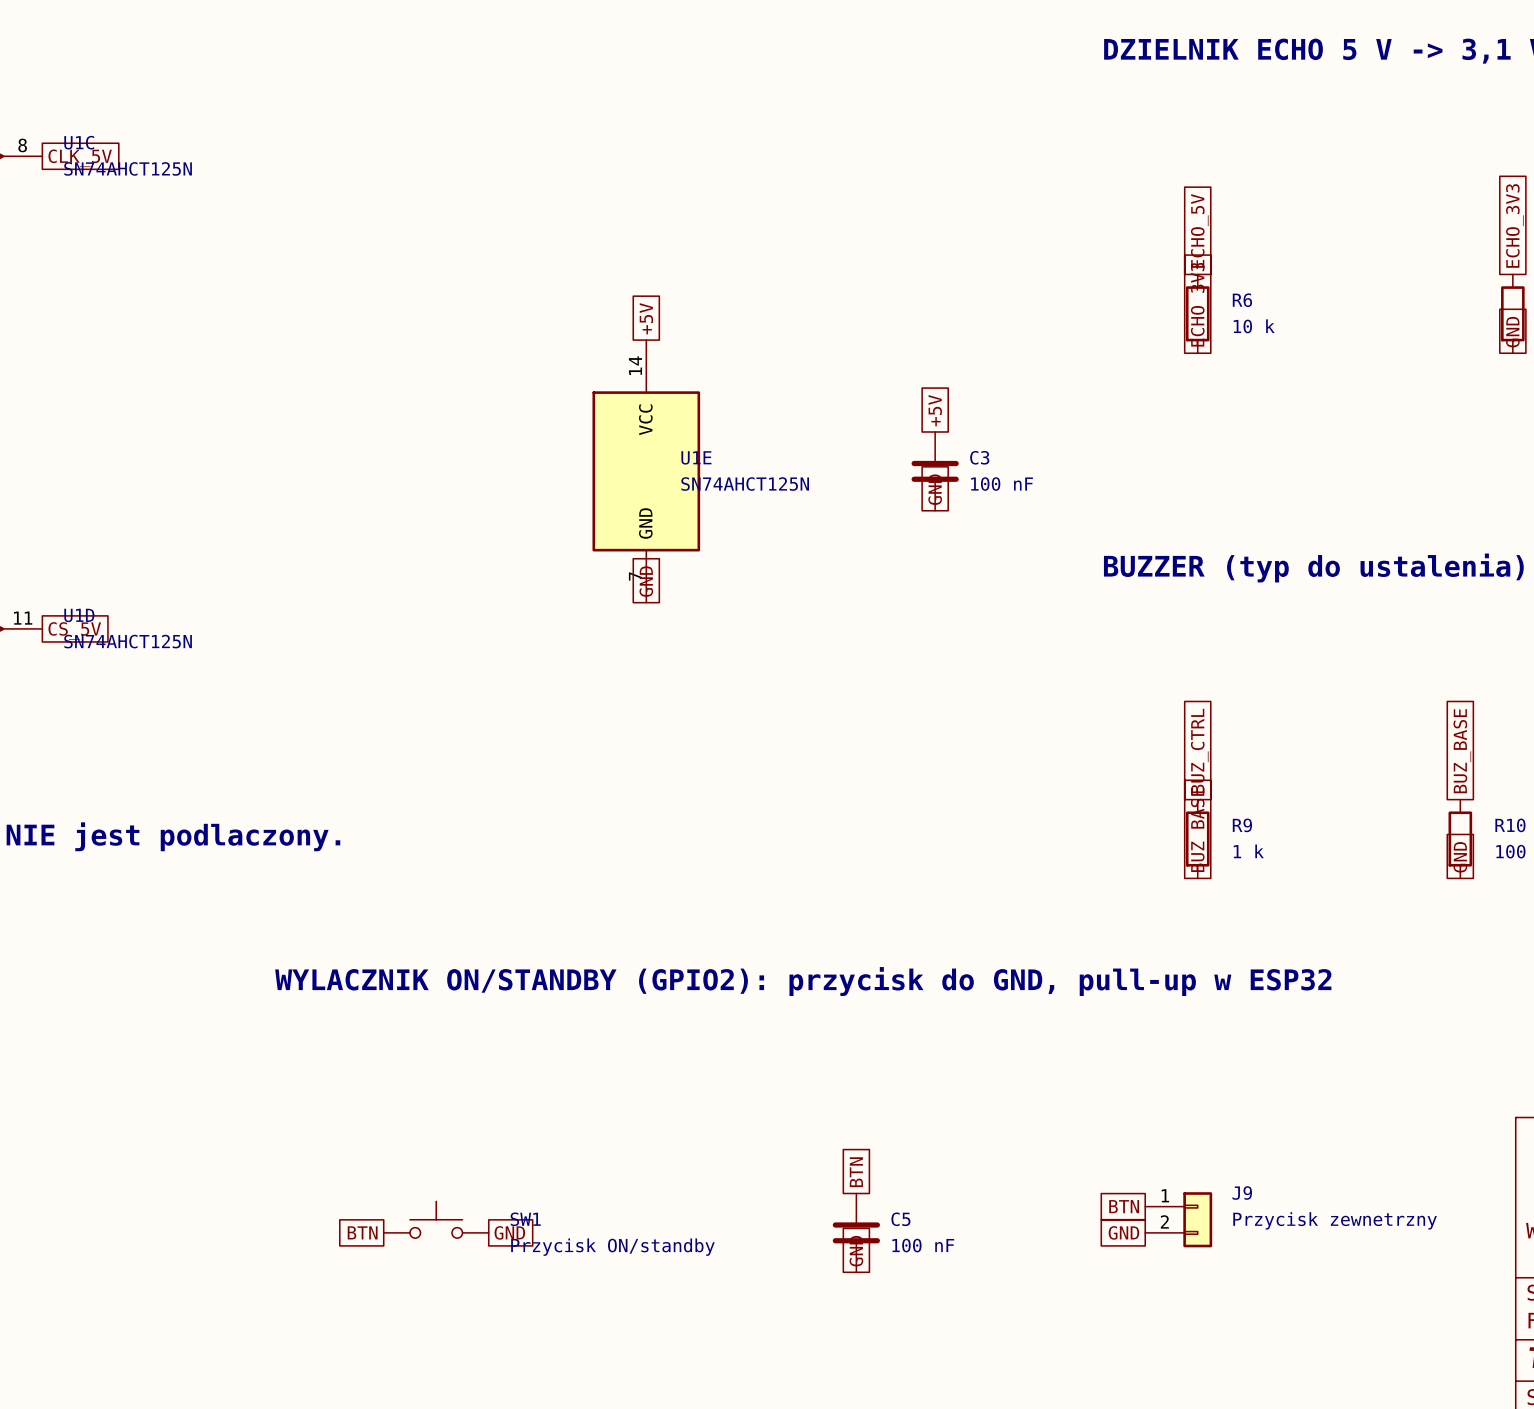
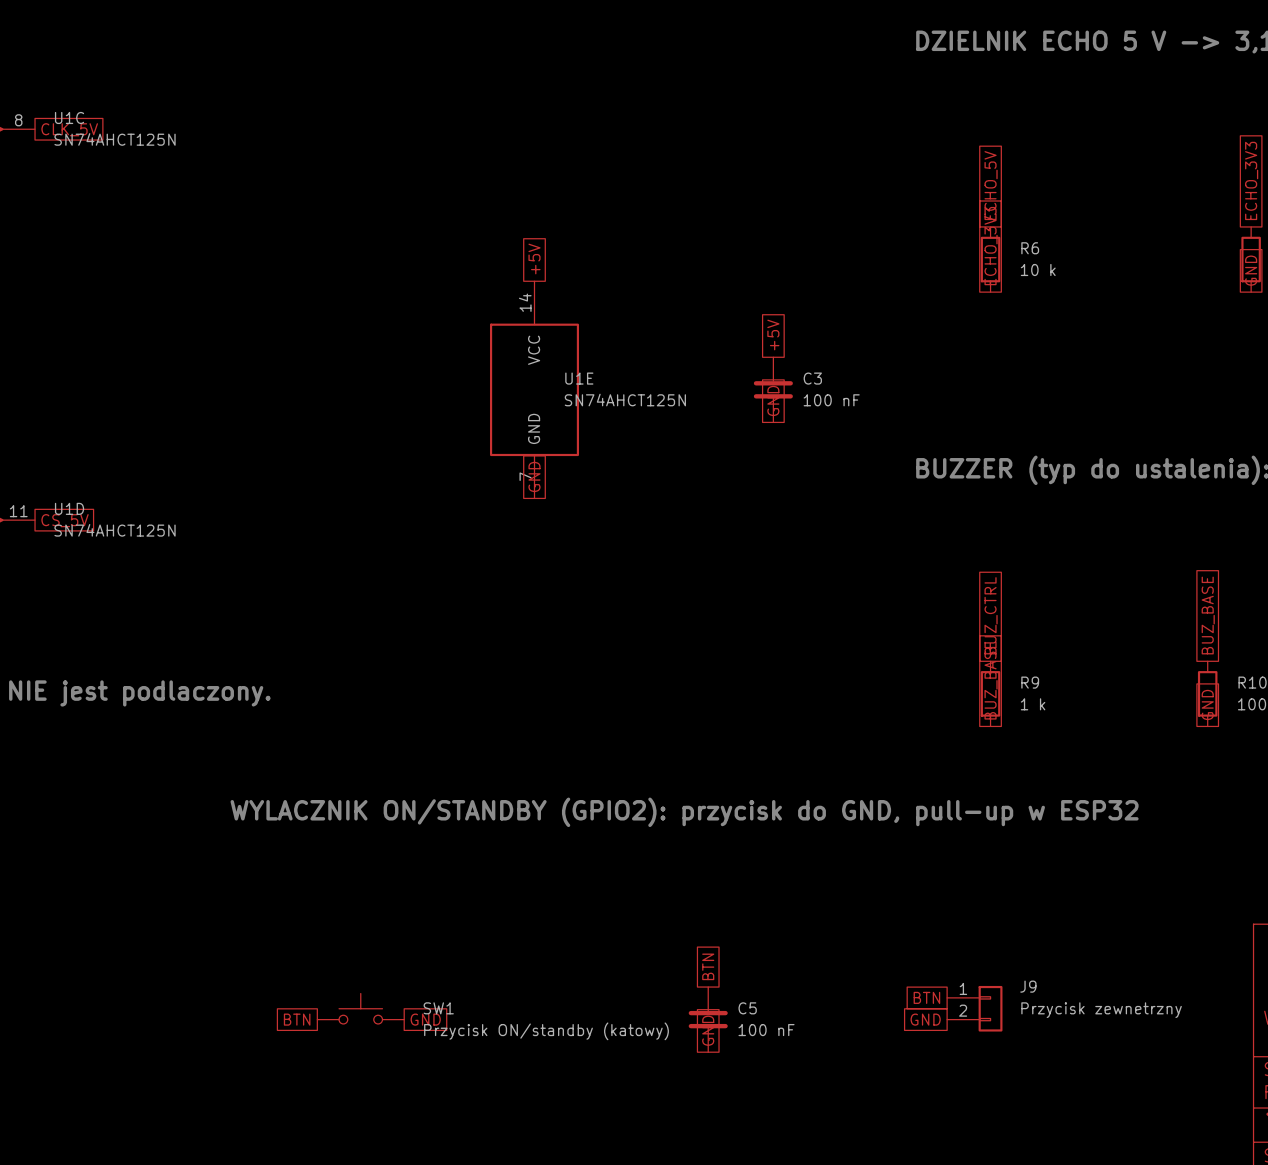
SW1 value: Przycisk ON/standby (612, 1247) -> Przycisk ON/standby (katowy) (546, 1031)

